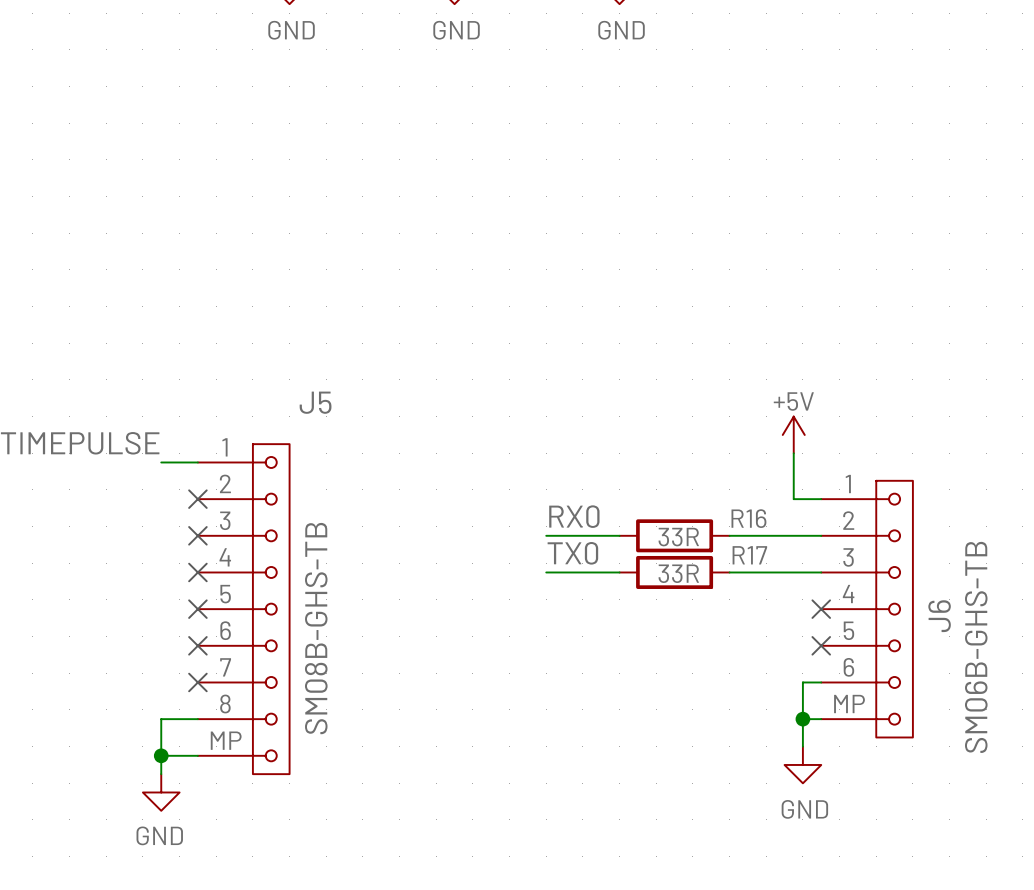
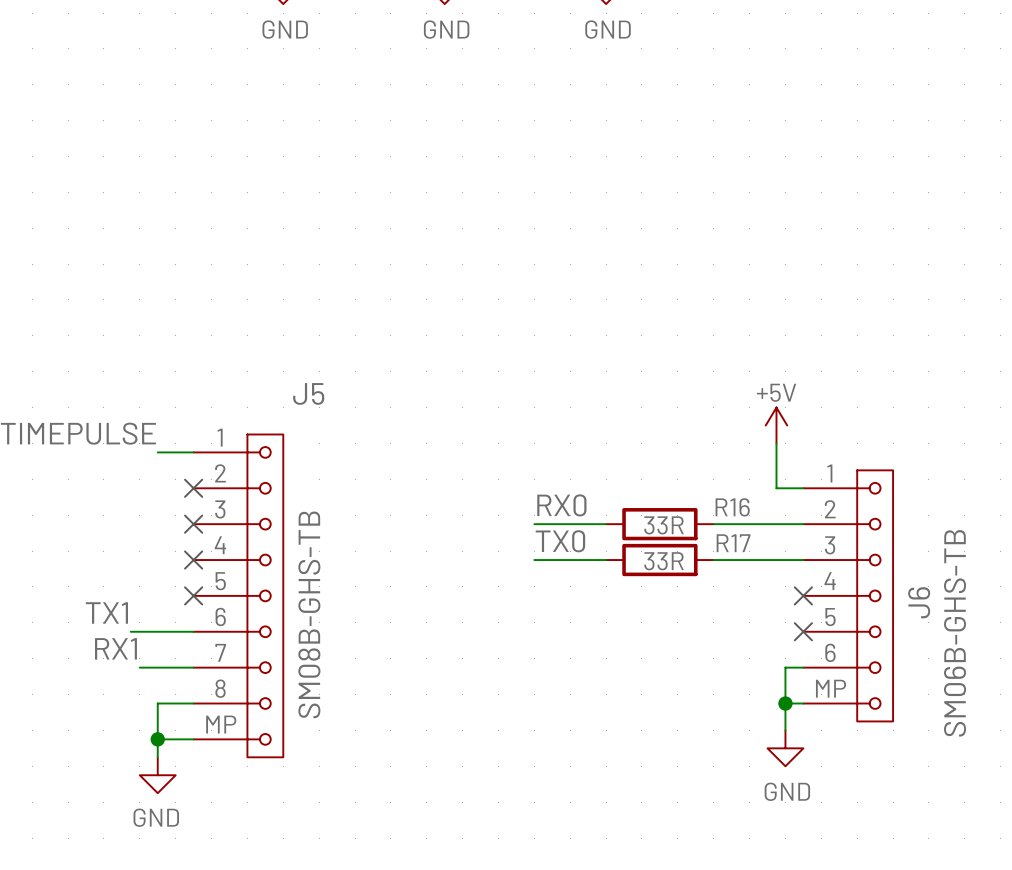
label: none -> TX1 (106, 612)
wire: none -> (130, 631) (193, 631)
no-connect mark: (197, 645) -> none
label: none -> RX1 (115, 648)
wire: none -> (139, 667) (193, 667)
no-connect mark: (197, 682) -> none

